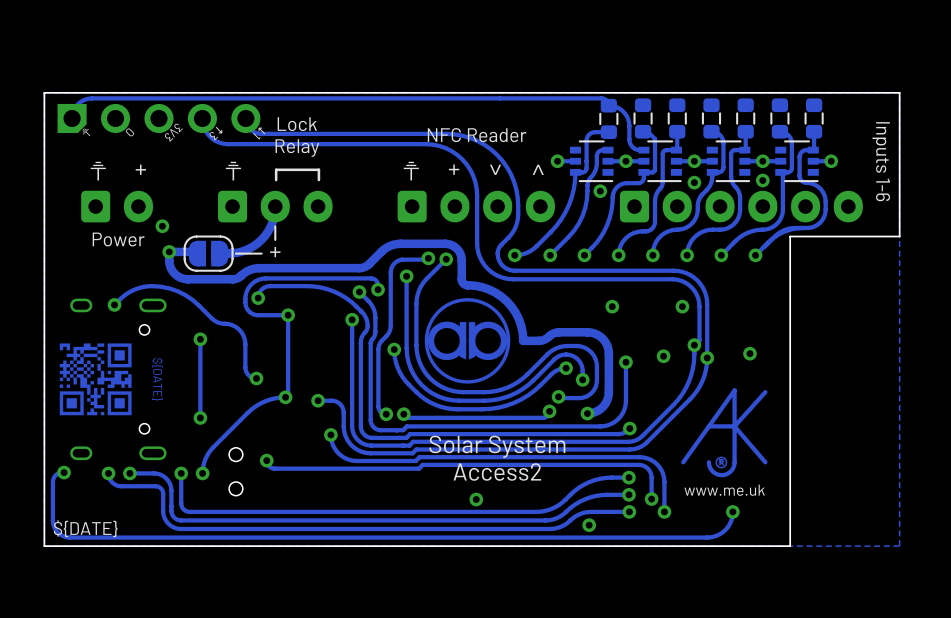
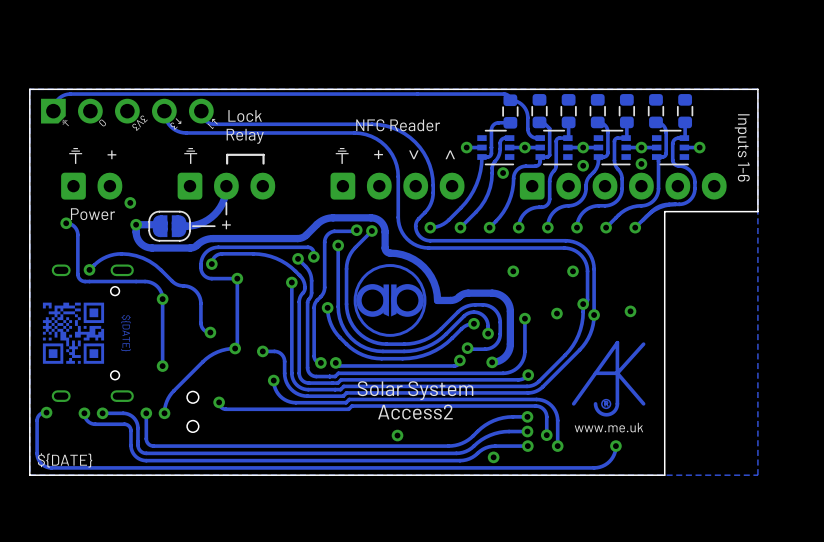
track: none -> (66, 223) (73, 225) (77, 231) (77, 275) (80, 280) (148, 281) (158, 288) (162, 299)
via: none -> (66, 223)

